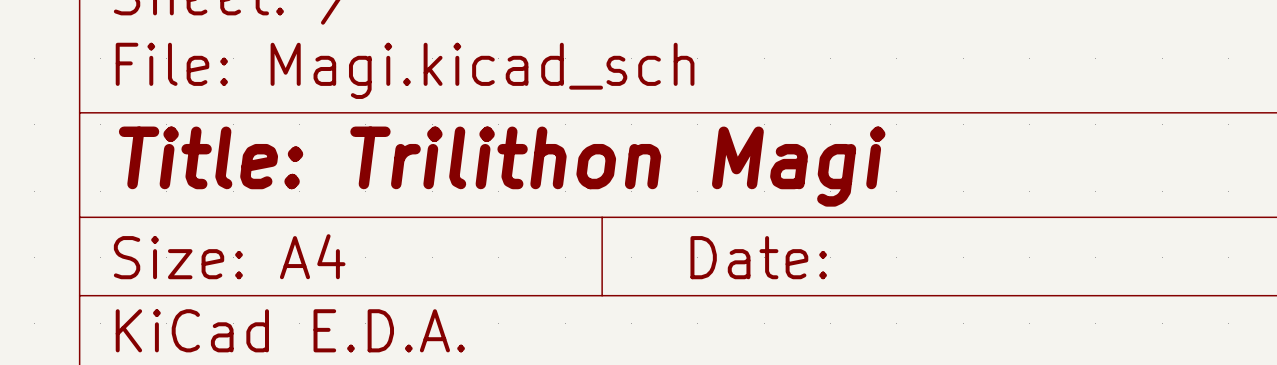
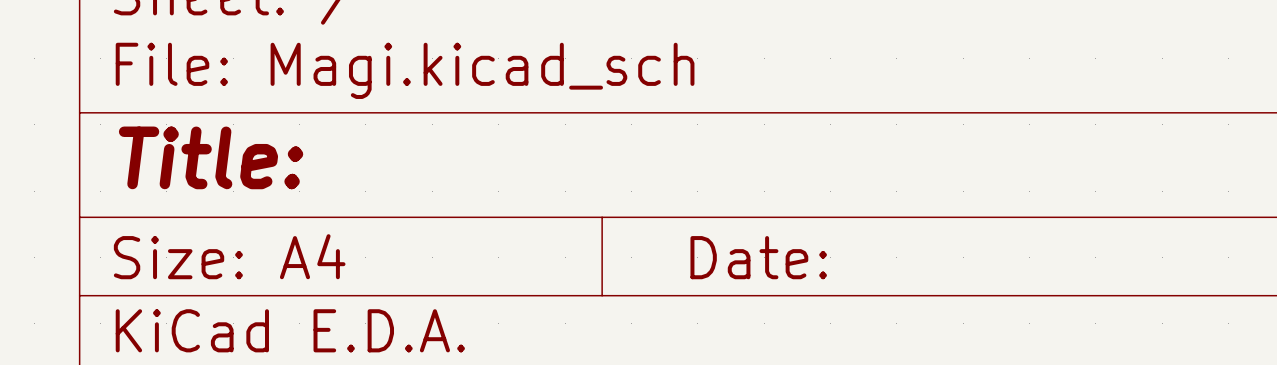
title block: Title: Trilithon Magi (502, 166) -> Title: (211, 157)

